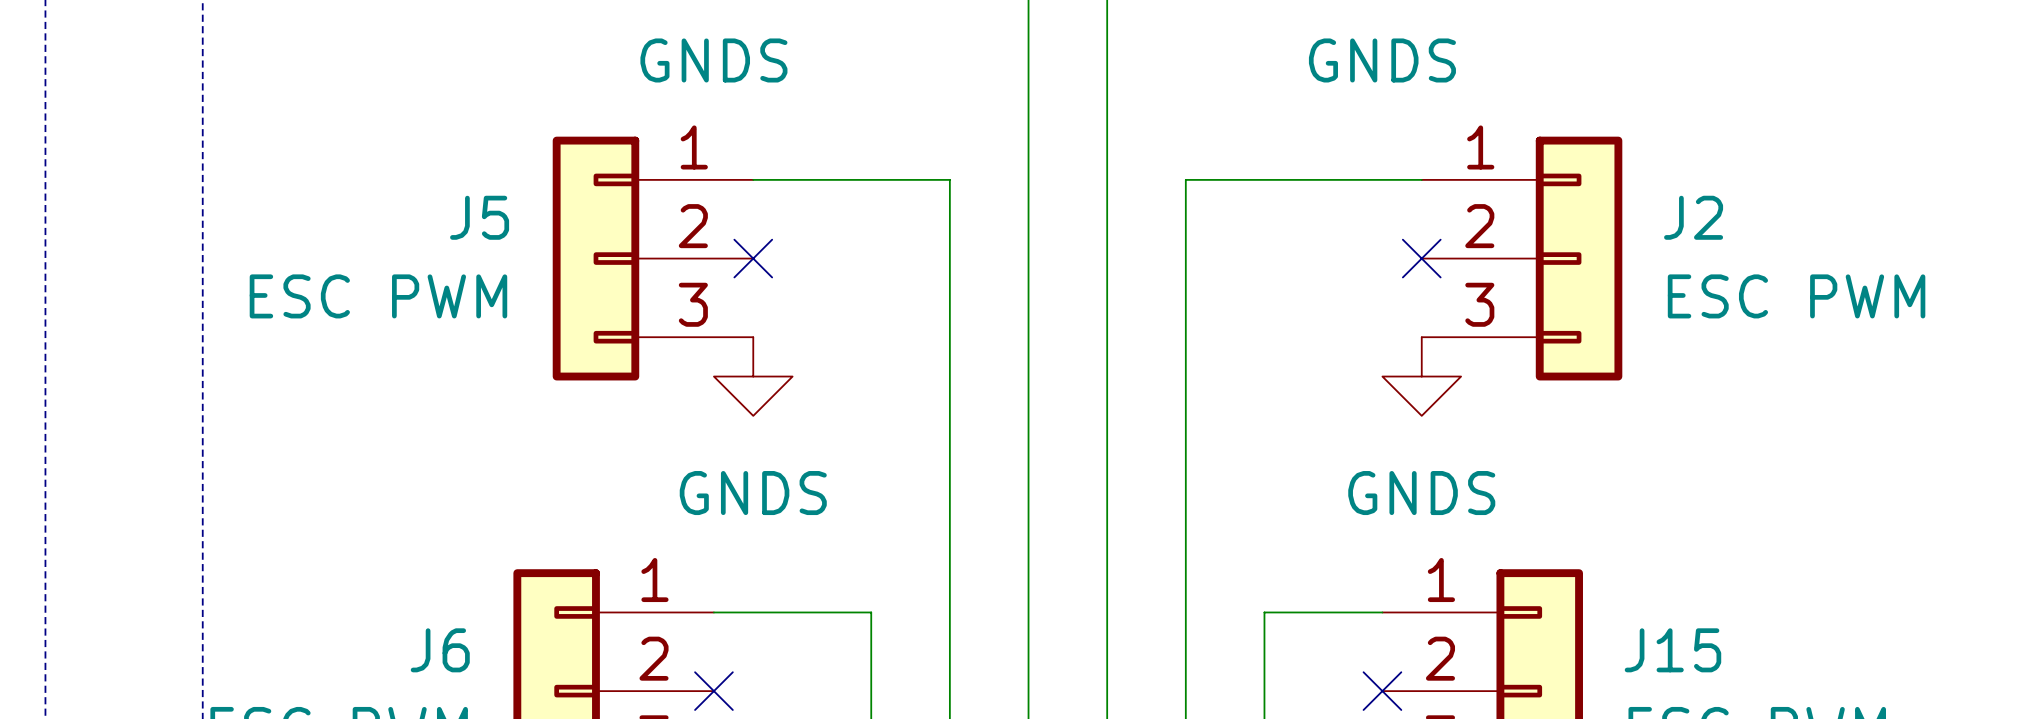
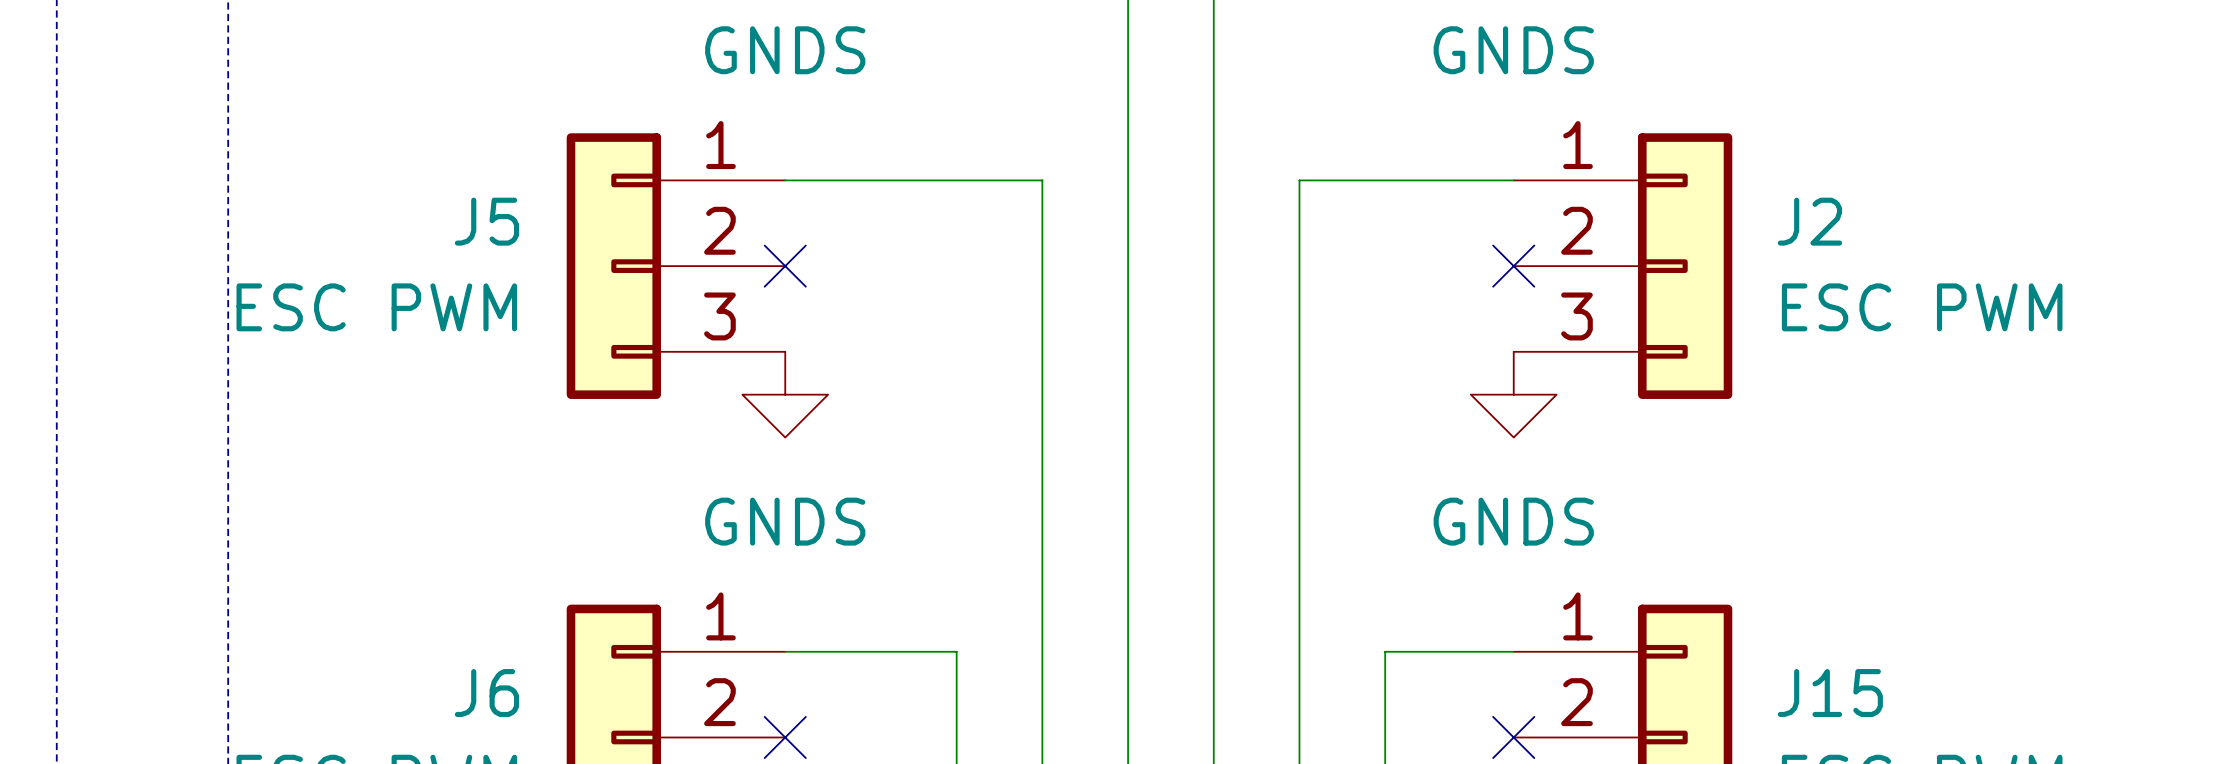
J5 position: (652, 258) -> (675, 266)
no-connect mark position: (753, 258) -> (785, 266)
no-connect mark position: (1421, 258) -> (1513, 266)
J2 position: (1522, 258) -> (1623, 266)
power symbol position: GNDS (753, 376) -> GNDS (785, 394)
power symbol position: GNDS (1421, 376) -> GNDS (1513, 394)

